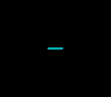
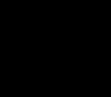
line: (48, 48) (62, 48) -> none

